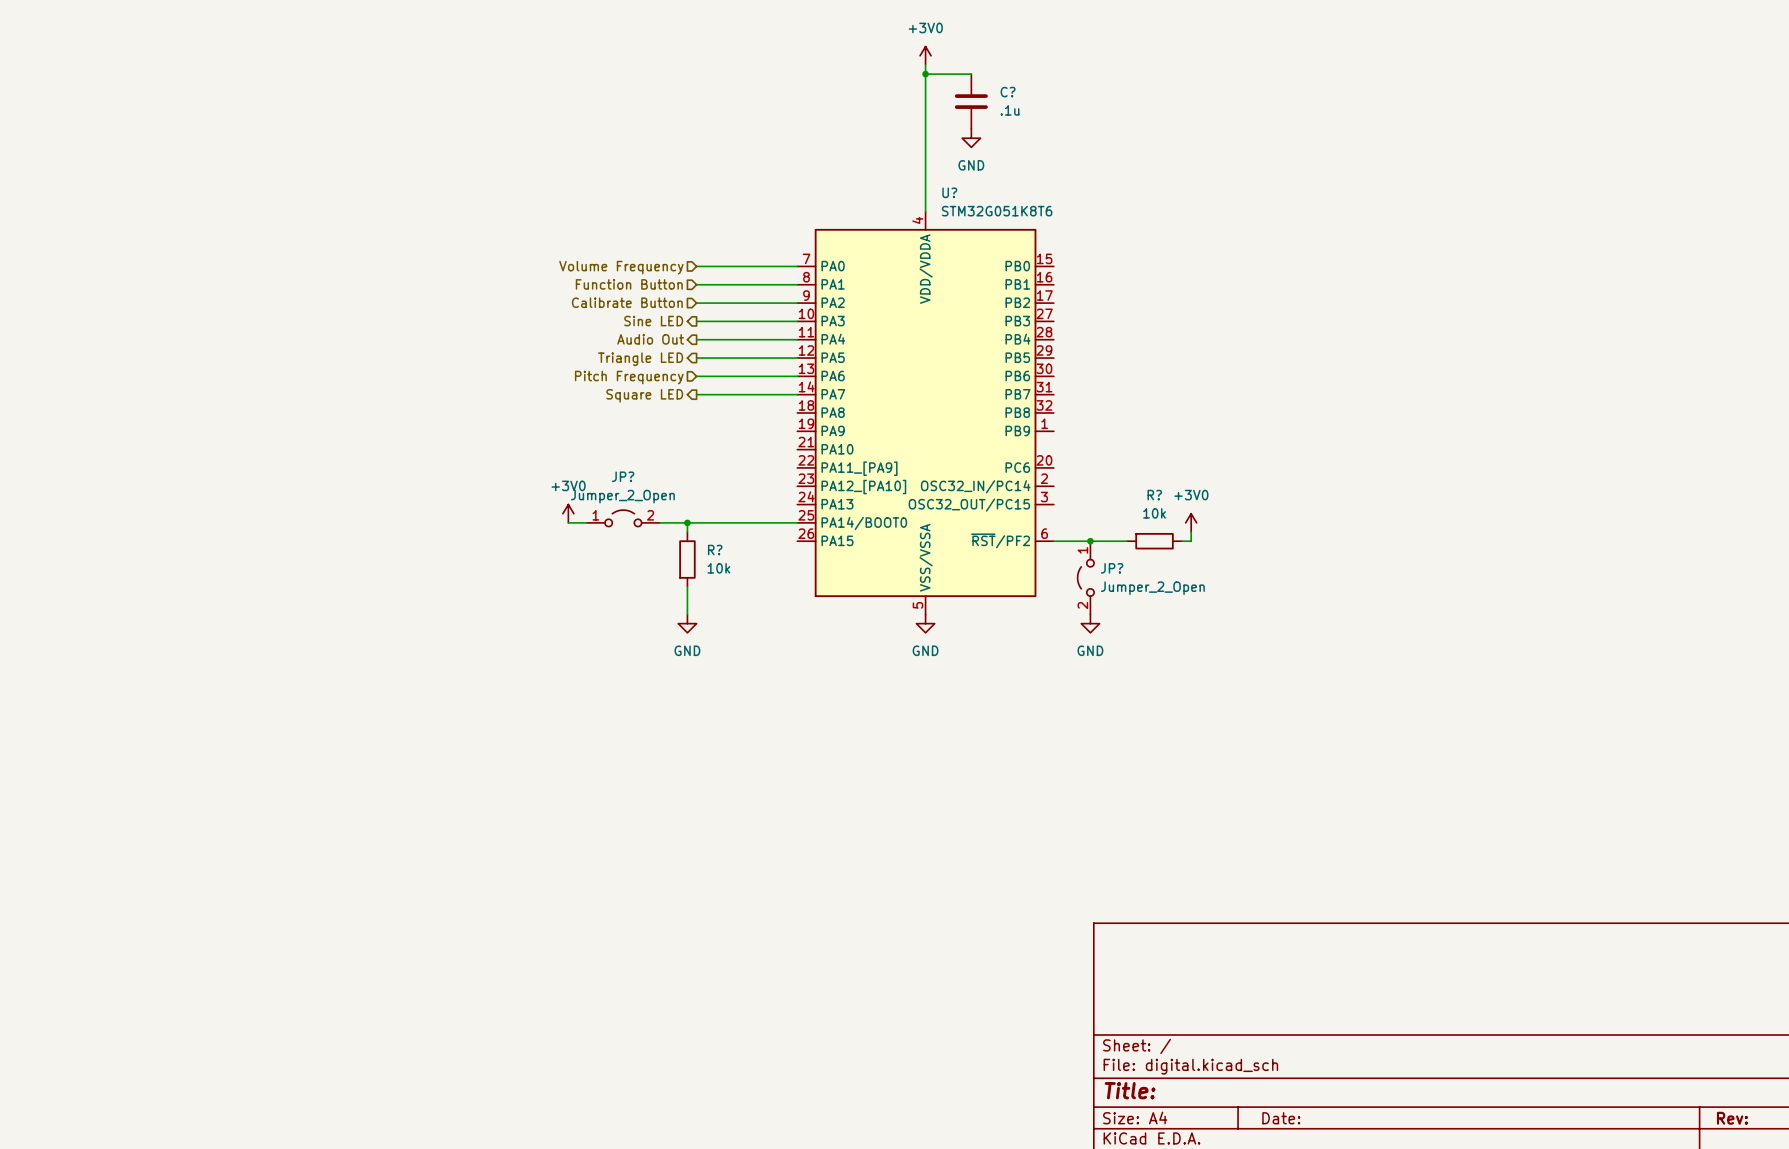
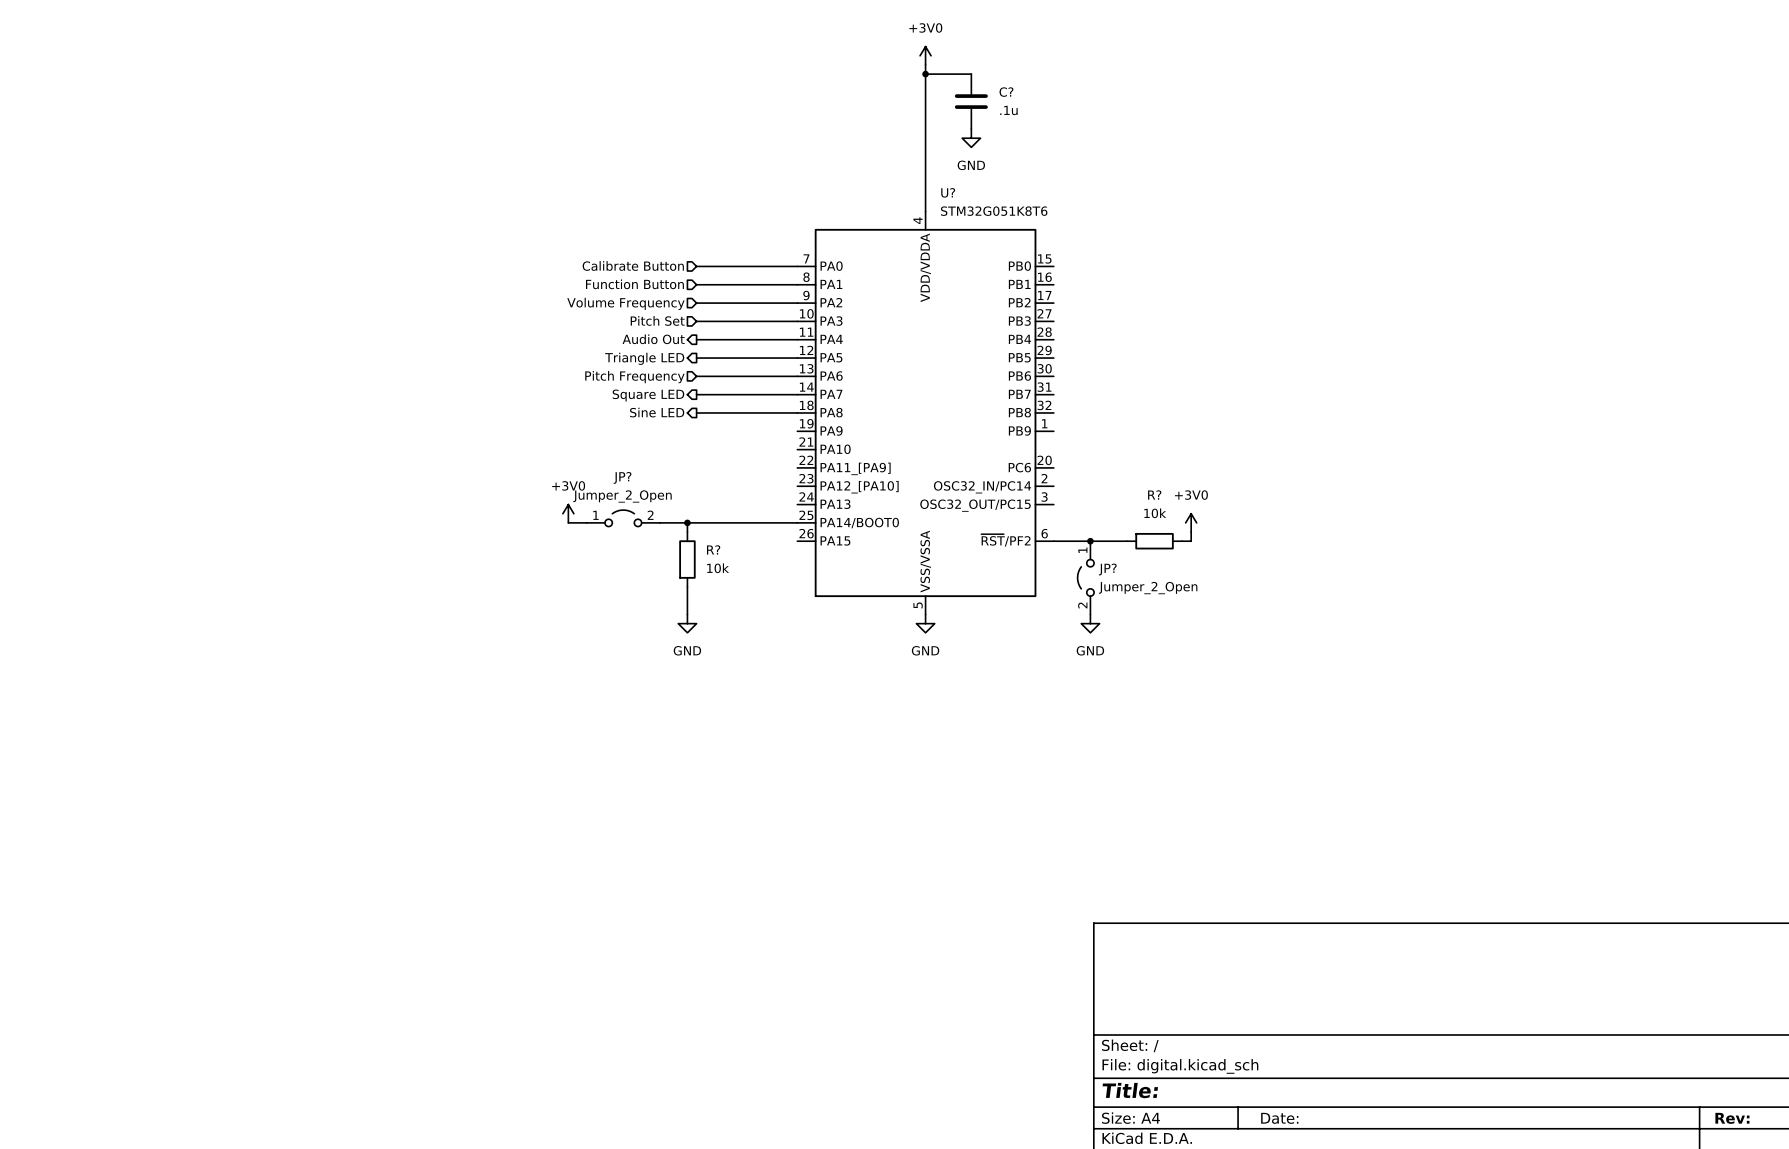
hierarchical label: Volume Frequency (621, 267) -> Calibrate Button (633, 265)
hierarchical label: Calibrate Button (627, 302) -> Volume Frequency (625, 303)
hierarchical label shape: output (653, 321) -> input (657, 320)
hierarchical label: Sine LED (653, 321) -> Pitch Set (657, 320)
hierarchical label: none -> Sine LED (657, 412)
wire: none -> (696, 412) (797, 412)

